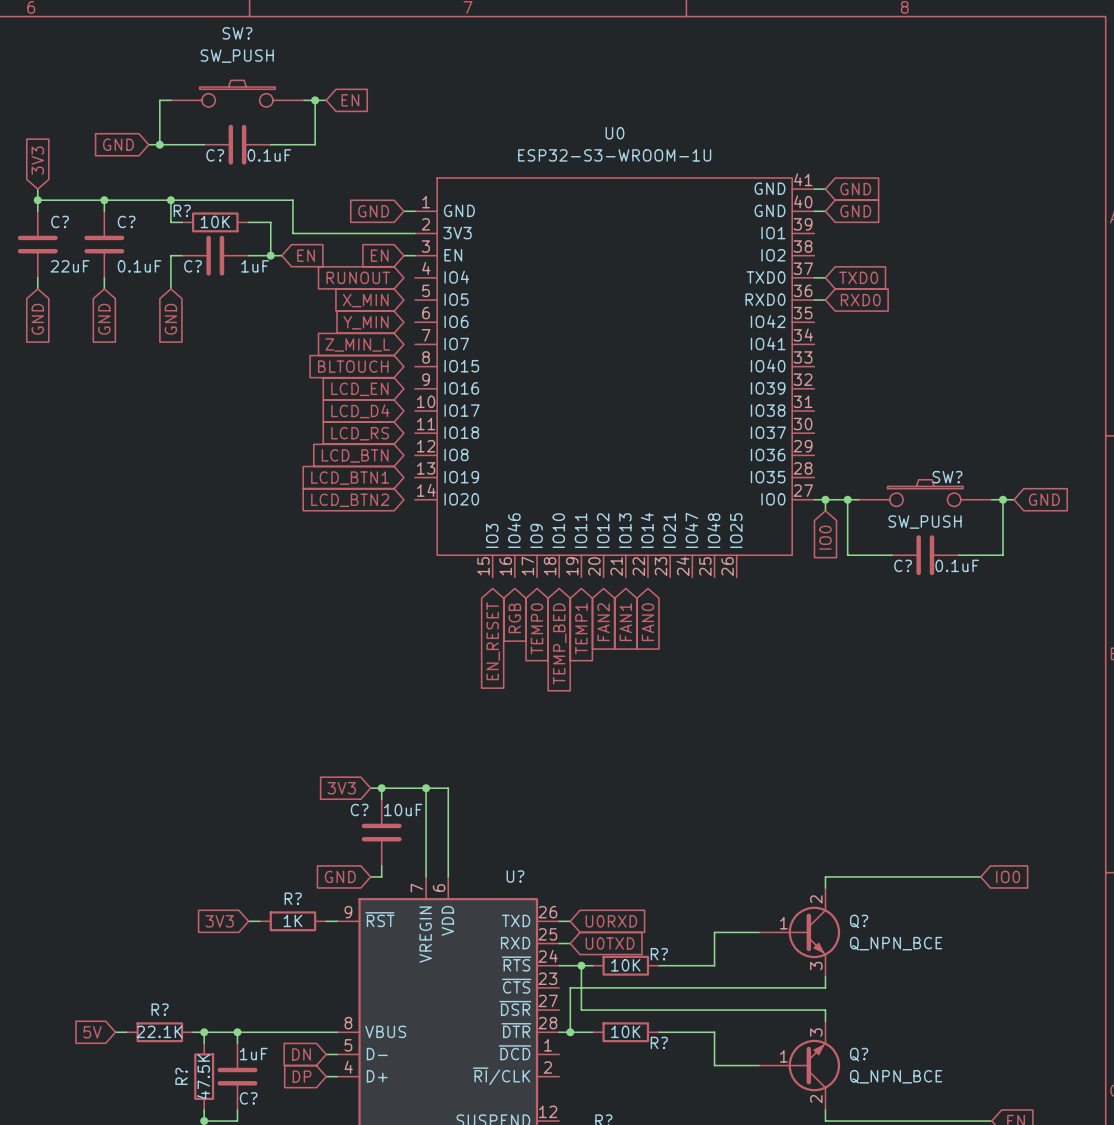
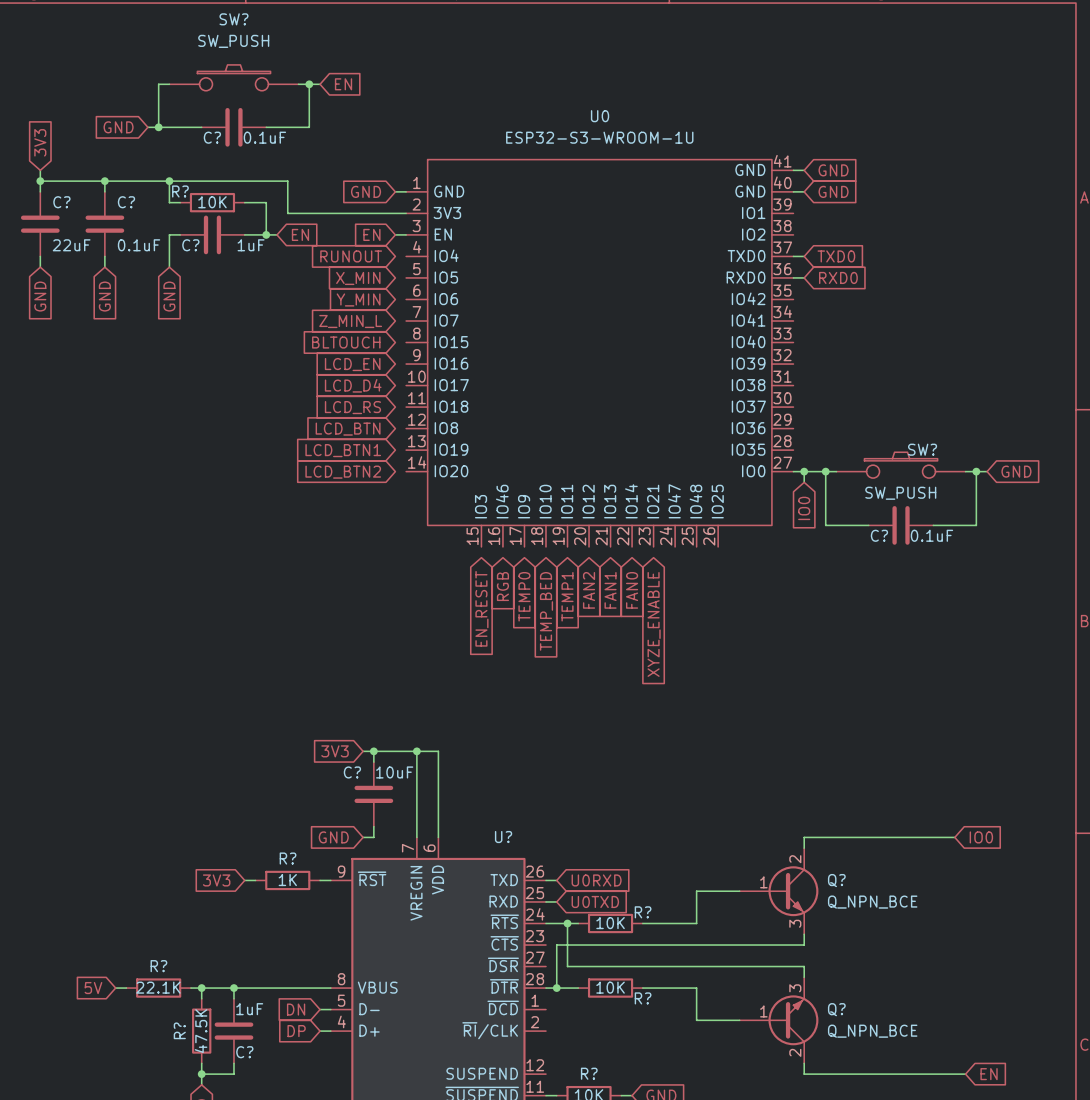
global label: none -> XYZE_ENABLE (654, 624)

